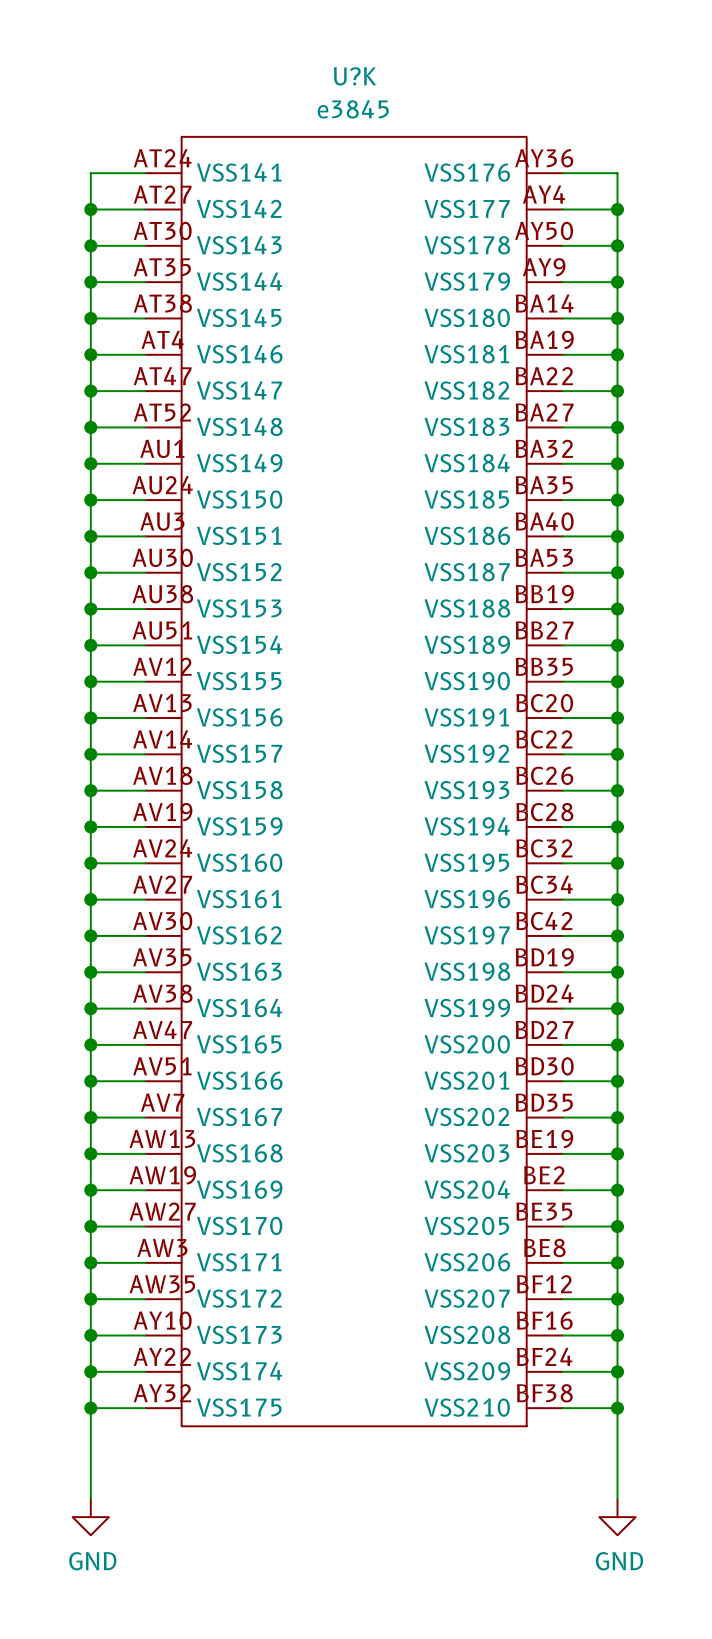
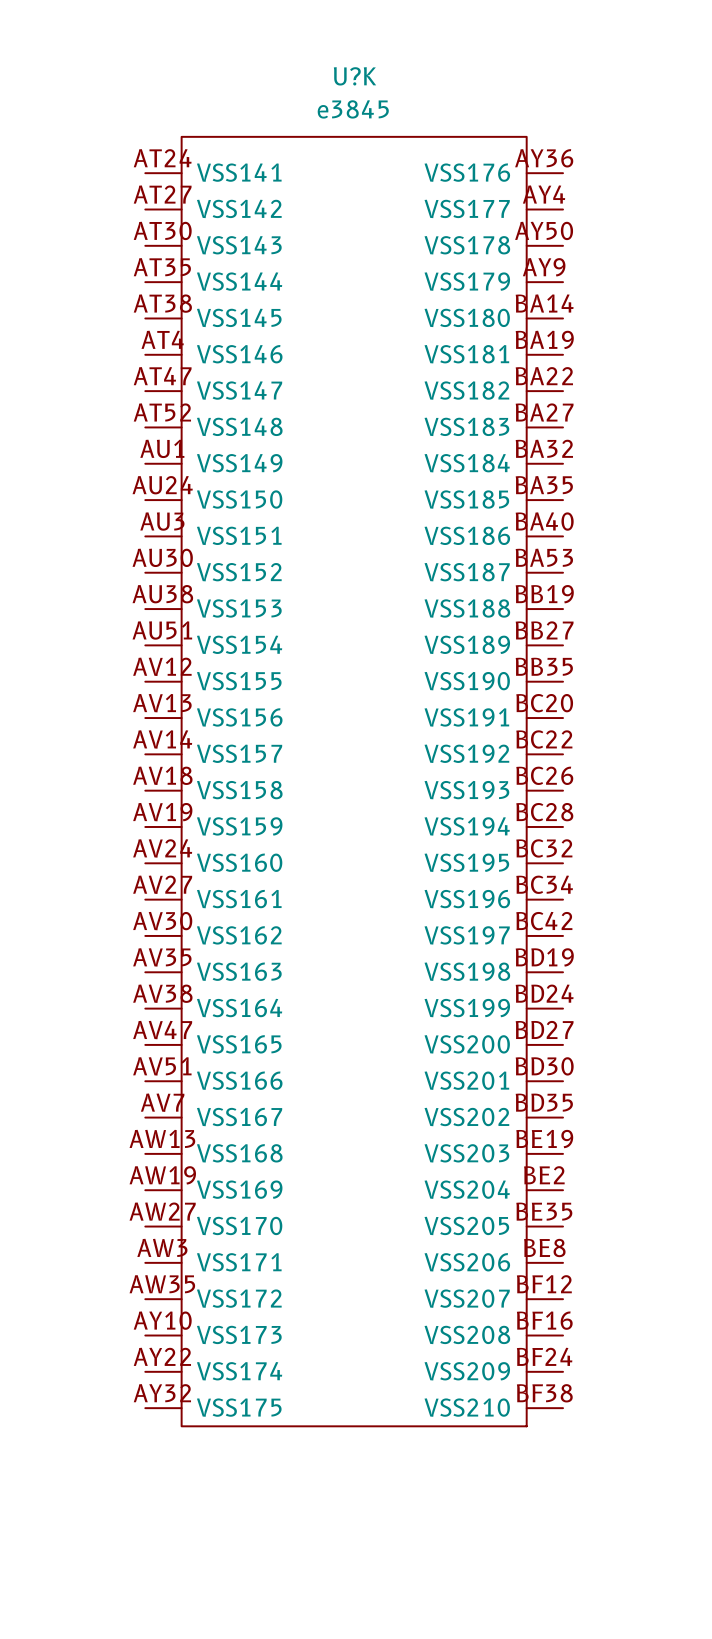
wire: (145, 173) (90, 173) (90, 1498) -> none
wire: (563, 173) (617, 173) (617, 1498) -> none
wire: (90, 209) (145, 209) -> none
junction: (90, 209) -> none
wire: (563, 209) (617, 209) -> none
junction: (617, 209) -> none
wire: (90, 245) (145, 245) -> none
junction: (90, 245) -> none
wire: (563, 245) (617, 245) -> none
junction: (617, 245) -> none
wire: (90, 282) (145, 282) -> none
junction: (90, 282) -> none
wire: (563, 282) (617, 282) -> none
junction: (617, 282) -> none
wire: (90, 318) (145, 318) -> none
junction: (90, 318) -> none
wire: (563, 318) (617, 318) -> none
junction: (617, 318) -> none
wire: (90, 354) (145, 354) -> none
junction: (90, 354) -> none
wire: (563, 354) (617, 354) -> none
junction: (617, 354) -> none
wire: (90, 391) (145, 391) -> none
junction: (90, 391) -> none
wire: (563, 391) (617, 391) -> none
junction: (617, 391) -> none
wire: (90, 427) (145, 427) -> none
junction: (90, 427) -> none
wire: (563, 427) (617, 427) -> none
junction: (617, 427) -> none
wire: (90, 463) (145, 463) -> none
junction: (90, 463) -> none
wire: (563, 463) (617, 463) -> none
junction: (617, 463) -> none
wire: (90, 500) (145, 500) -> none
junction: (90, 500) -> none
wire: (563, 500) (617, 500) -> none
junction: (617, 500) -> none
wire: (90, 536) (145, 536) -> none
junction: (90, 536) -> none
wire: (563, 536) (617, 536) -> none
junction: (617, 536) -> none
wire: (90, 572) (145, 572) -> none
junction: (90, 572) -> none
wire: (563, 572) (617, 572) -> none
junction: (617, 572) -> none
wire: (90, 609) (145, 609) -> none
junction: (90, 609) -> none
wire: (563, 609) (617, 609) -> none
junction: (617, 609) -> none
wire: (90, 645) (145, 645) -> none
junction: (90, 645) -> none
wire: (563, 645) (617, 645) -> none
junction: (617, 645) -> none
wire: (90, 681) (145, 681) -> none
junction: (90, 681) -> none
wire: (563, 681) (617, 681) -> none
junction: (617, 681) -> none
wire: (90, 718) (145, 718) -> none
junction: (90, 718) -> none
wire: (563, 718) (617, 718) -> none
junction: (617, 718) -> none
wire: (90, 754) (145, 754) -> none
junction: (90, 754) -> none
wire: (563, 754) (617, 754) -> none
junction: (617, 754) -> none
wire: (90, 790) (145, 790) -> none
junction: (90, 790) -> none
wire: (563, 790) (617, 790) -> none
junction: (617, 790) -> none
wire: (90, 826) (145, 826) -> none
junction: (90, 826) -> none
wire: (563, 826) (617, 826) -> none
junction: (617, 826) -> none
wire: (90, 863) (145, 863) -> none
junction: (90, 863) -> none
wire: (563, 863) (617, 863) -> none
junction: (617, 863) -> none
wire: (90, 899) (145, 899) -> none
junction: (90, 899) -> none
wire: (563, 899) (617, 899) -> none
junction: (617, 899) -> none
wire: (90, 935) (145, 935) -> none
junction: (90, 935) -> none
wire: (563, 935) (617, 935) -> none
junction: (617, 935) -> none
wire: (90, 972) (145, 972) -> none
junction: (90, 972) -> none
wire: (563, 972) (617, 972) -> none
junction: (617, 972) -> none
wire: (90, 1008) (145, 1008) -> none
junction: (90, 1008) -> none
wire: (563, 1008) (617, 1008) -> none
junction: (617, 1008) -> none
wire: (90, 1044) (145, 1044) -> none
junction: (90, 1044) -> none
wire: (563, 1044) (617, 1044) -> none
junction: (617, 1044) -> none
wire: (90, 1081) (145, 1081) -> none
junction: (90, 1081) -> none
wire: (563, 1081) (617, 1081) -> none
junction: (617, 1081) -> none
wire: (90, 1117) (145, 1117) -> none
junction: (90, 1117) -> none
wire: (563, 1117) (617, 1117) -> none
junction: (617, 1117) -> none
wire: (90, 1153) (145, 1153) -> none
junction: (90, 1153) -> none
wire: (563, 1153) (617, 1153) -> none
junction: (617, 1153) -> none
wire: (90, 1190) (145, 1190) -> none
junction: (90, 1190) -> none
wire: (563, 1190) (617, 1190) -> none
junction: (617, 1190) -> none
wire: (90, 1226) (145, 1226) -> none
junction: (90, 1226) -> none
wire: (563, 1226) (617, 1226) -> none
junction: (617, 1226) -> none
wire: (90, 1262) (145, 1262) -> none
junction: (90, 1262) -> none
wire: (563, 1262) (617, 1262) -> none
junction: (617, 1262) -> none
wire: (90, 1299) (145, 1299) -> none
junction: (90, 1299) -> none
wire: (563, 1299) (617, 1299) -> none
junction: (617, 1299) -> none
wire: (90, 1335) (145, 1335) -> none
junction: (90, 1335) -> none
wire: (563, 1335) (617, 1335) -> none
junction: (617, 1335) -> none
wire: (90, 1371) (145, 1371) -> none
junction: (90, 1371) -> none
wire: (563, 1371) (617, 1371) -> none
junction: (617, 1371) -> none
wire: (90, 1408) (145, 1408) -> none
junction: (90, 1408) -> none
wire: (563, 1408) (617, 1408) -> none
junction: (617, 1408) -> none
power symbol: GND (90, 1517) -> none
power symbol: GND (617, 1517) -> none

